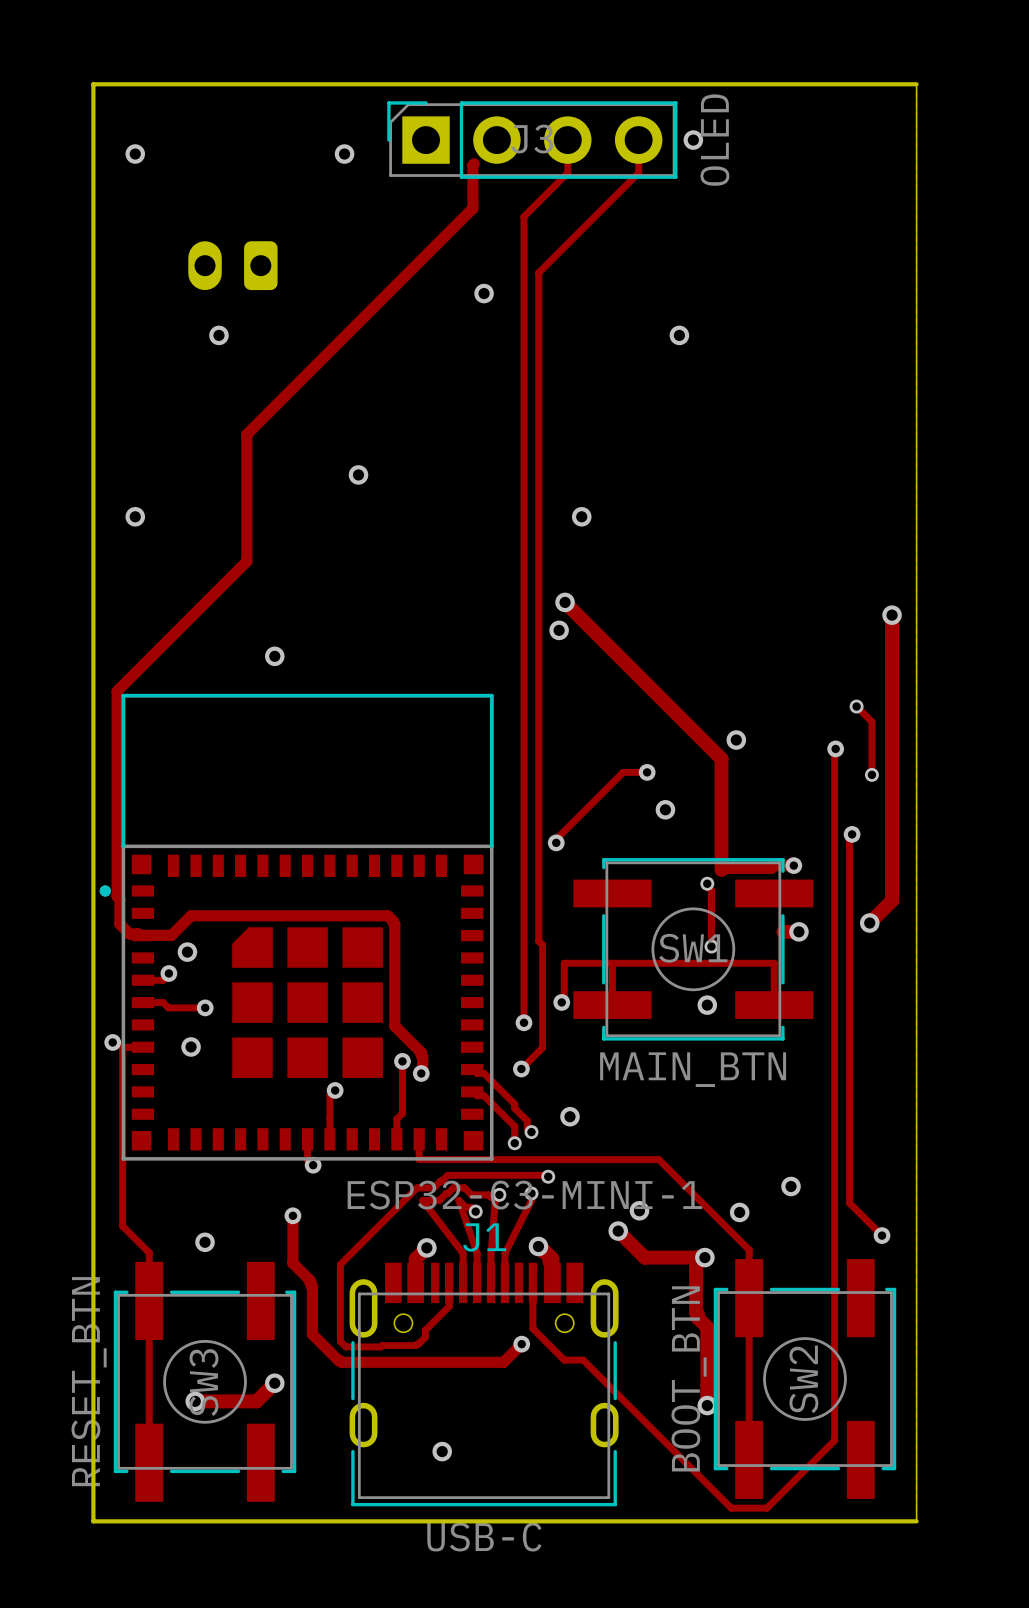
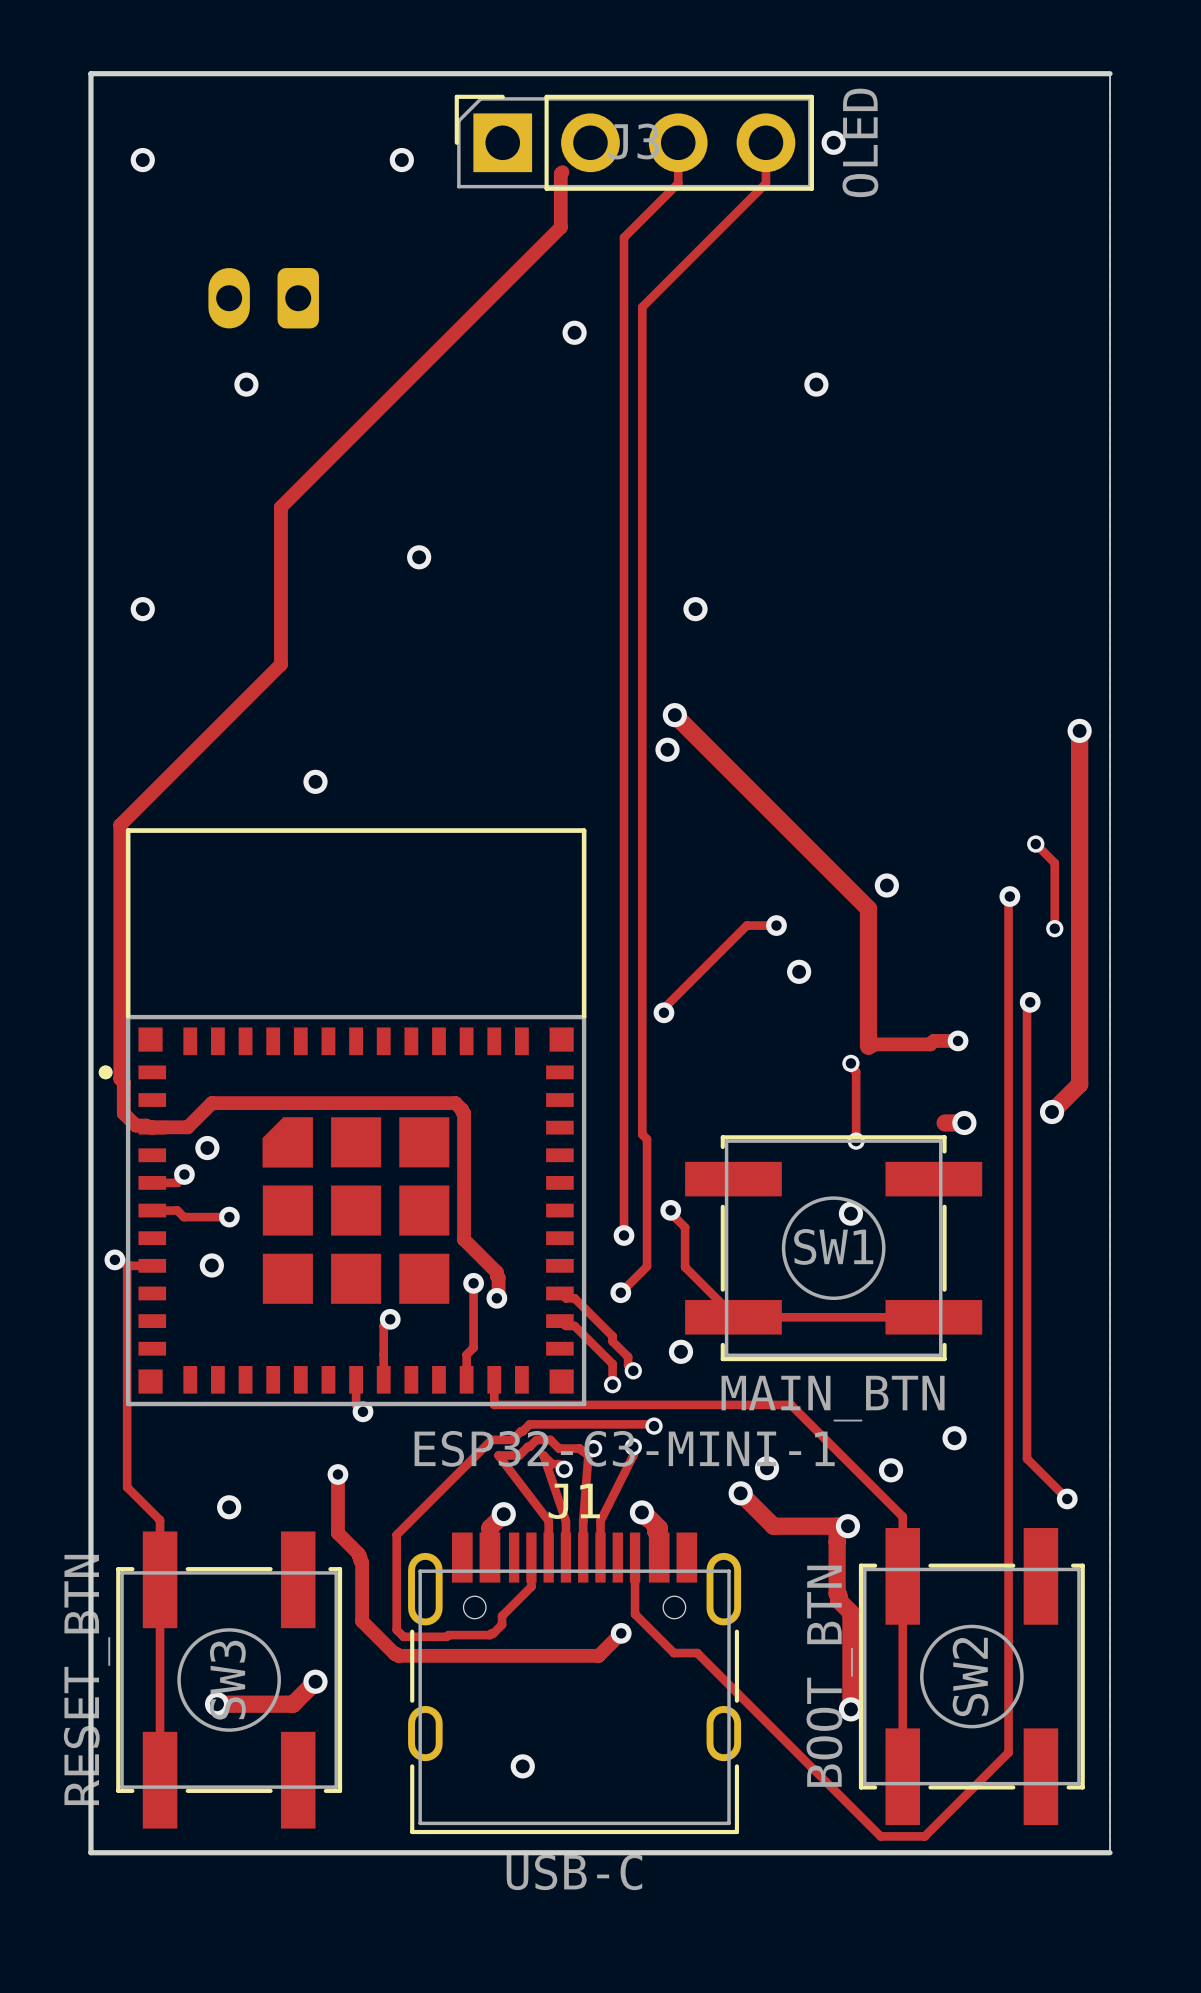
SW1 position: (693, 949) -> (833, 1248)
track: (612, 963) (612, 1005) -> none
track: (561, 1002) (564, 999) (564, 963) (774, 963) (774, 1005) -> (670, 1210) (685, 1227) (685, 1267) (733, 1317) (933, 1317)

